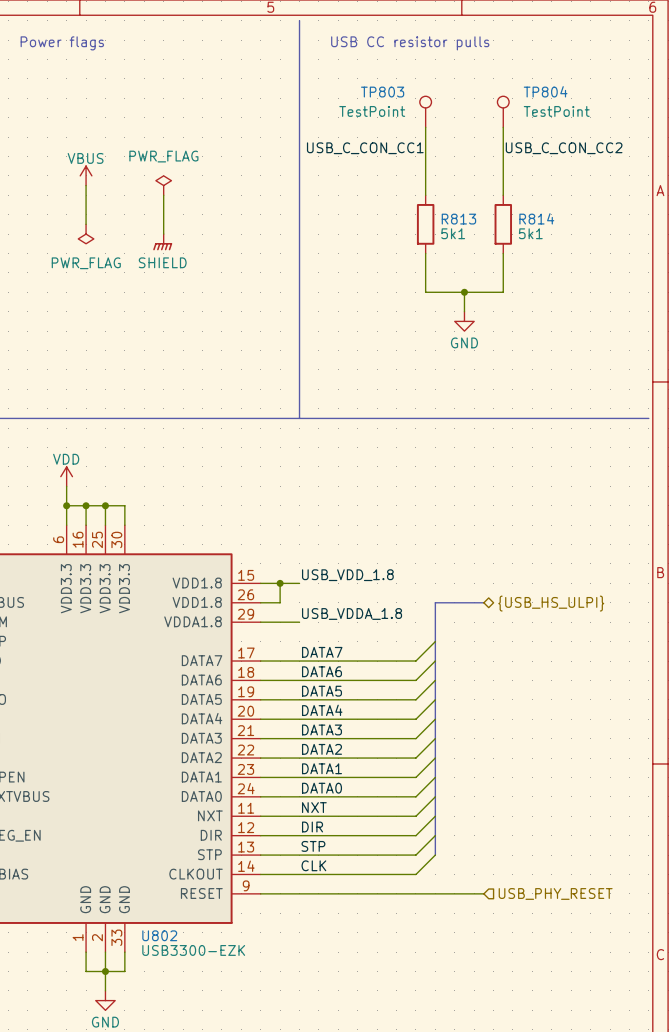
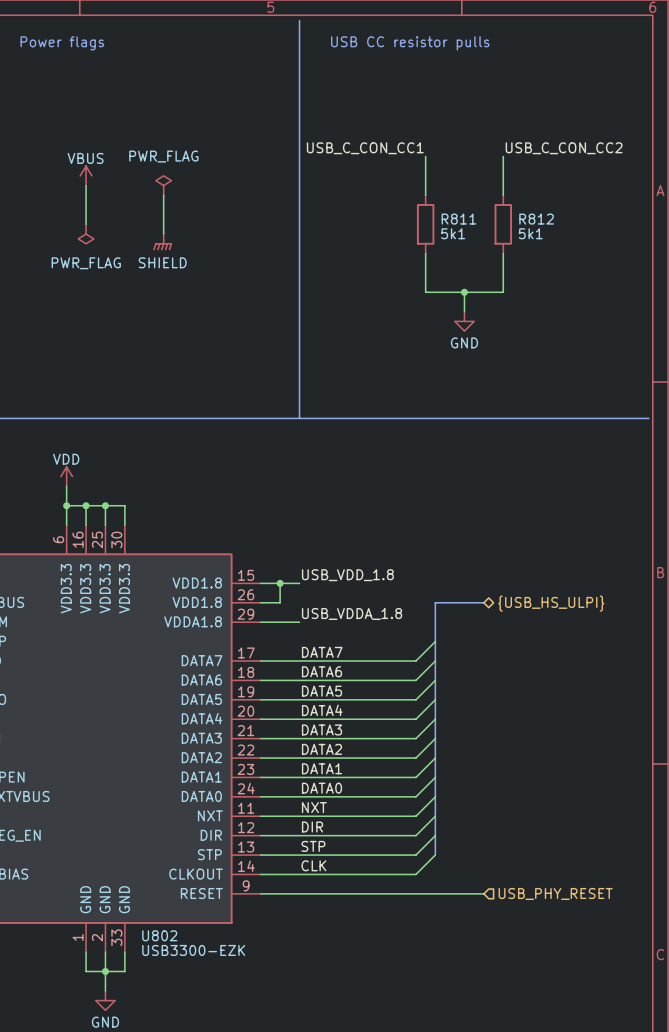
TP803: TestPoint (425, 111) -> none
TP804: TestPoint (503, 111) -> none
wire: (425, 127) (425, 156) -> none
wire: (503, 127) (503, 156) -> none
R814 name: R814 (536, 218) -> R812 (536, 219)
R813 name: R813 (458, 219) -> R811 (458, 219)

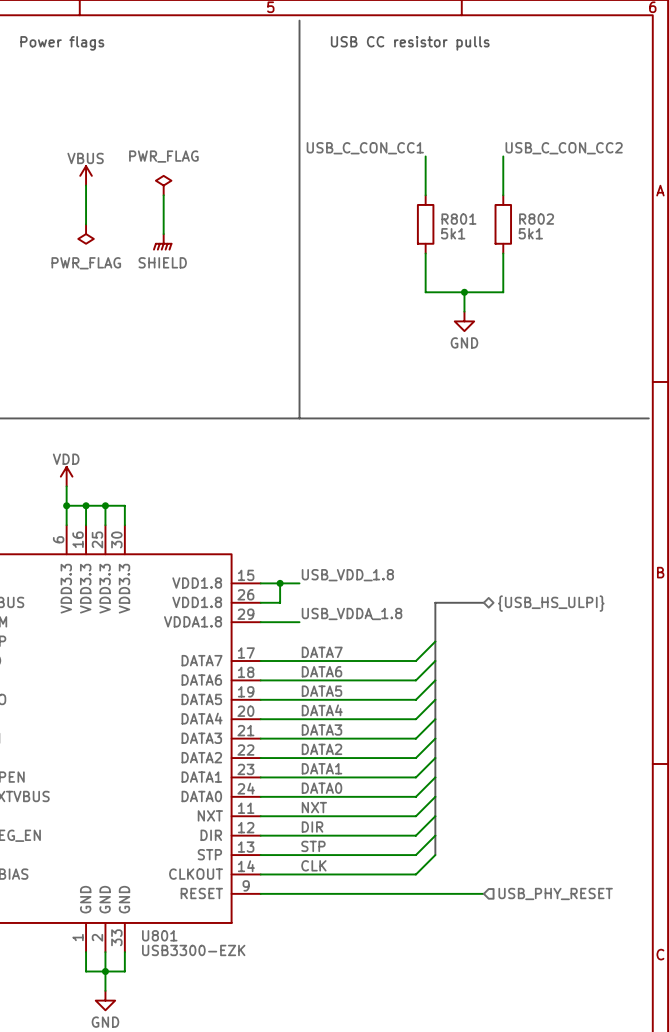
R811 name: R811 (458, 219) -> R801 (458, 219)
R812 name: R812 (536, 219) -> R802 (536, 219)
U802 name: U802 (159, 935) -> U801 (159, 935)

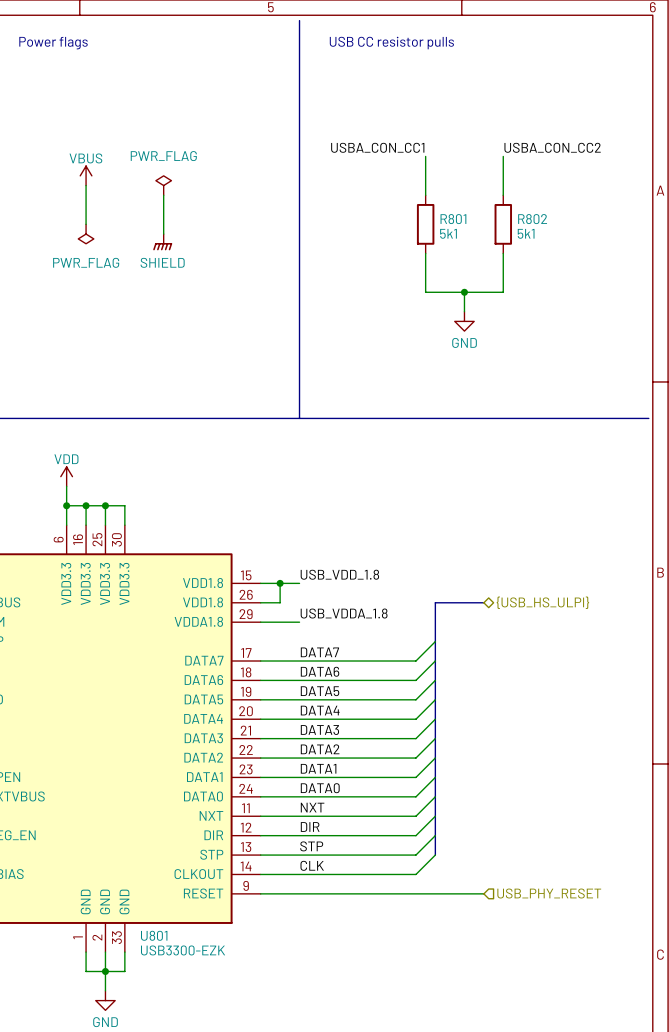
label: USB_C_CON_CC1 (365, 148) -> USBA_CON_CC1 (377, 147)
label: USB_C_CON_CC2 (564, 148) -> USBA_CON_CC2 (552, 147)

